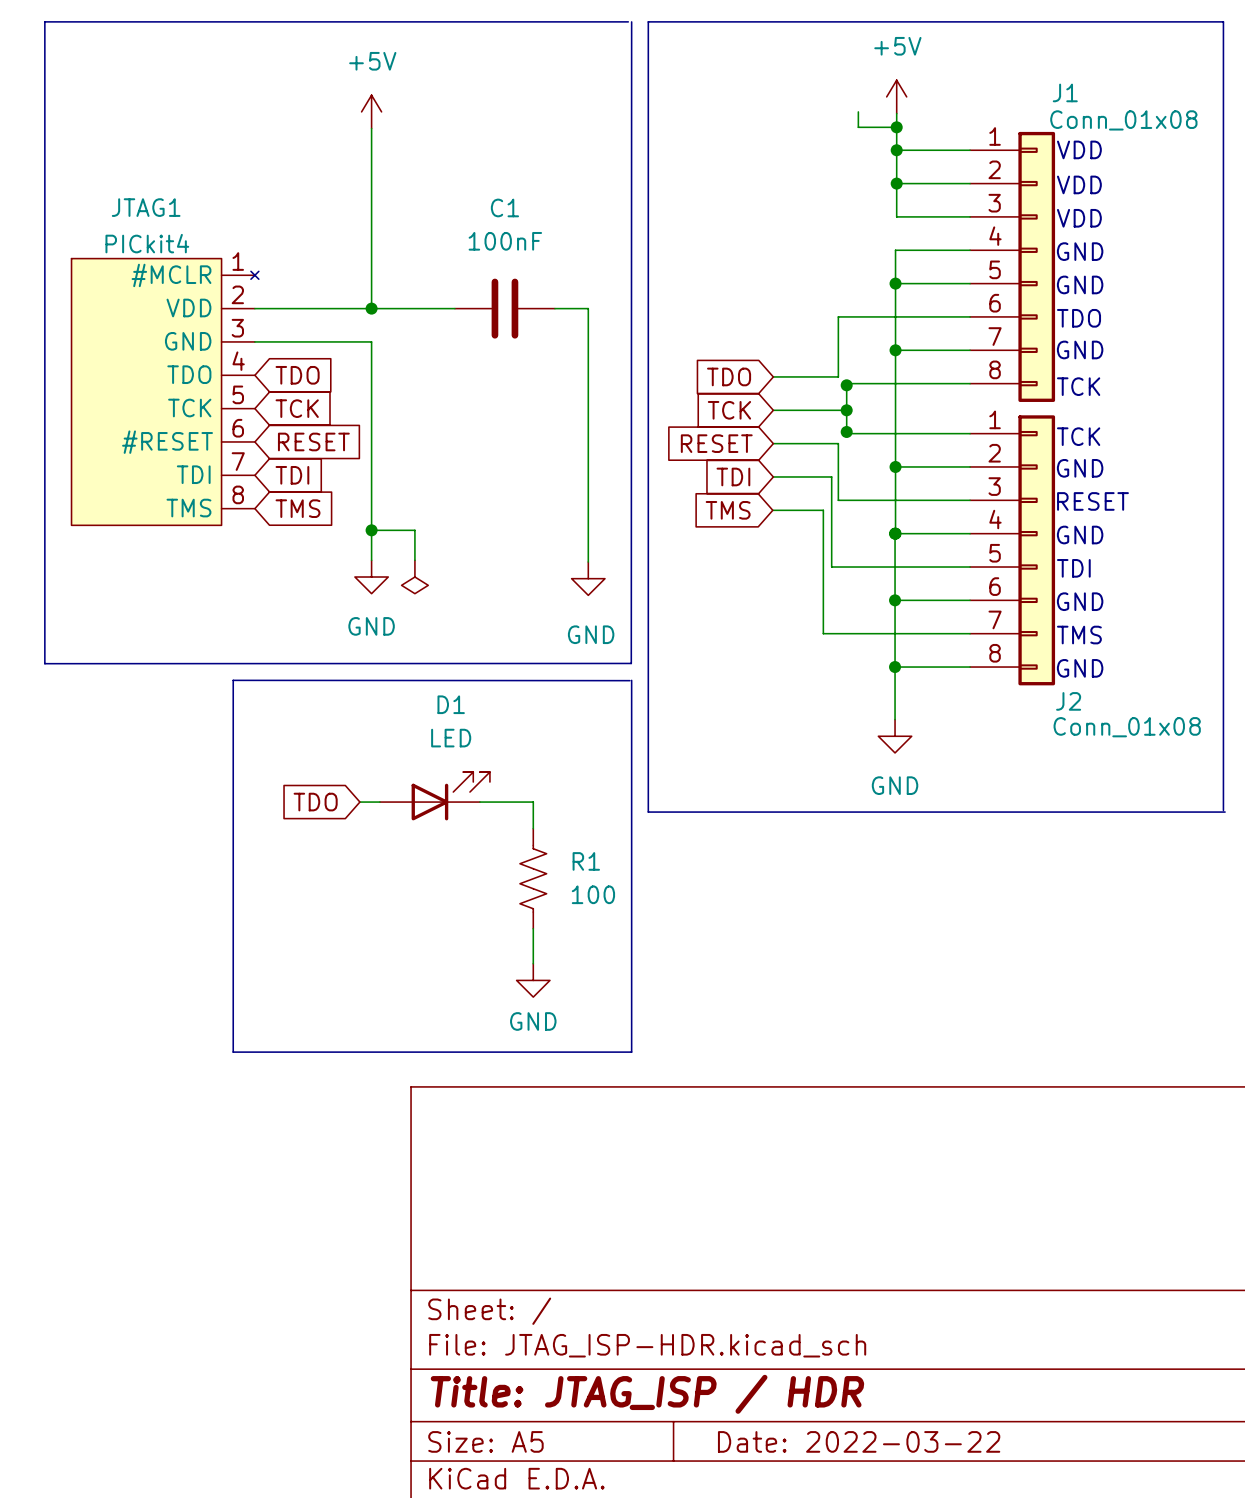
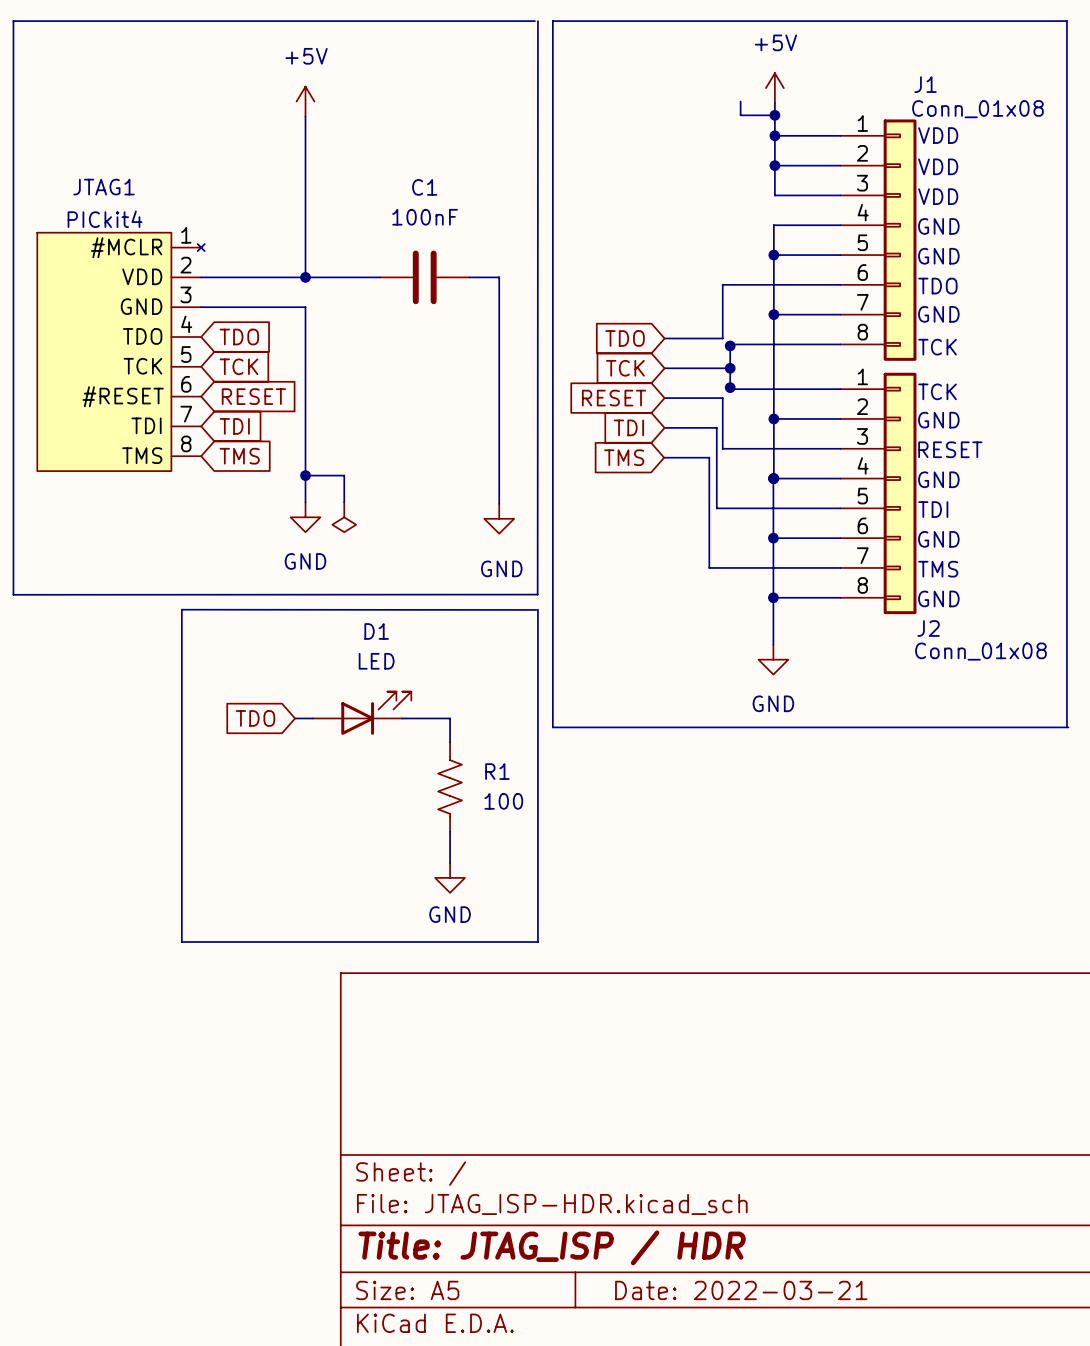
title block: Date: 2022-03-22 (859, 1441) -> Date: 2022-03-21 (741, 1290)

